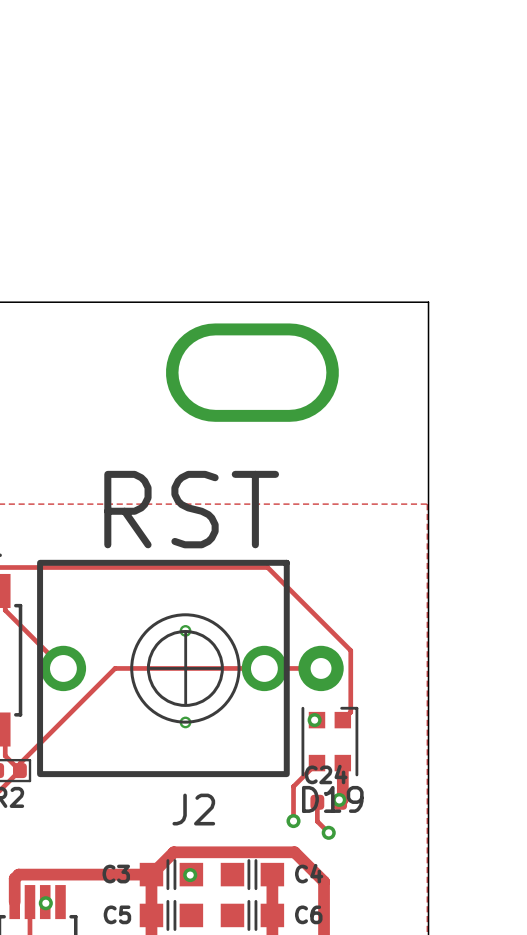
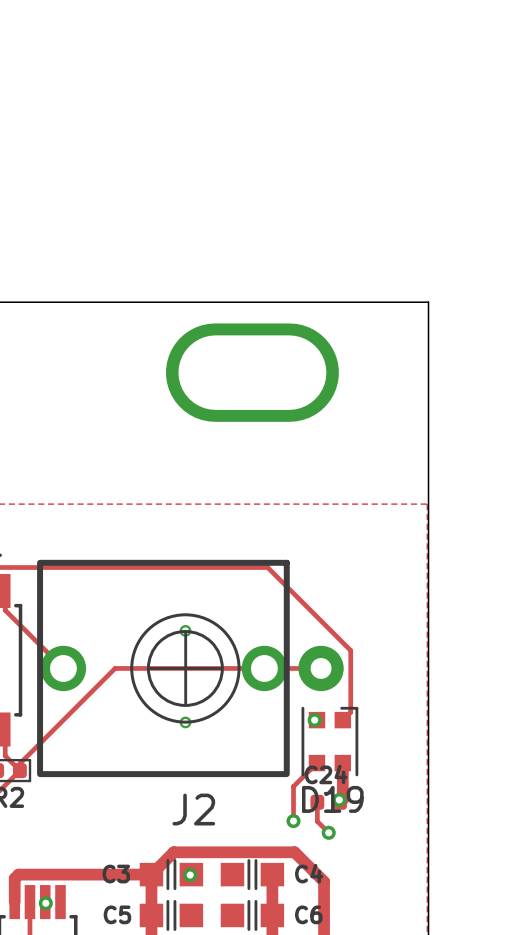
text: RST (191, 509) -> none

